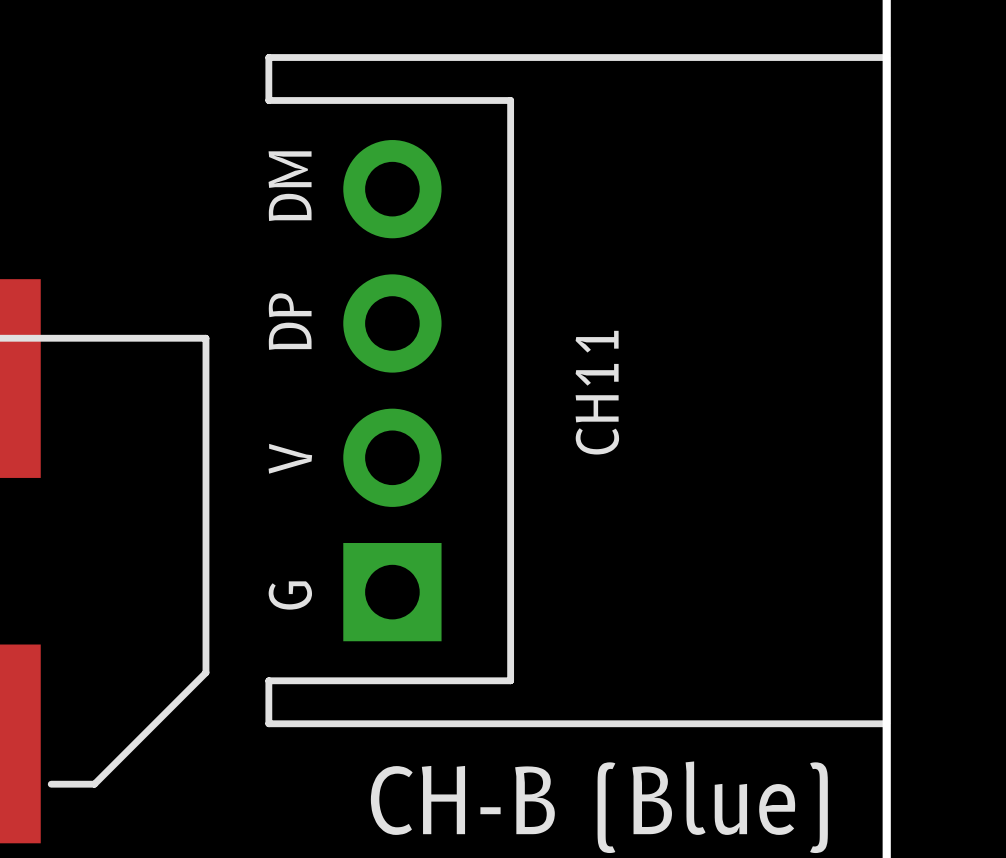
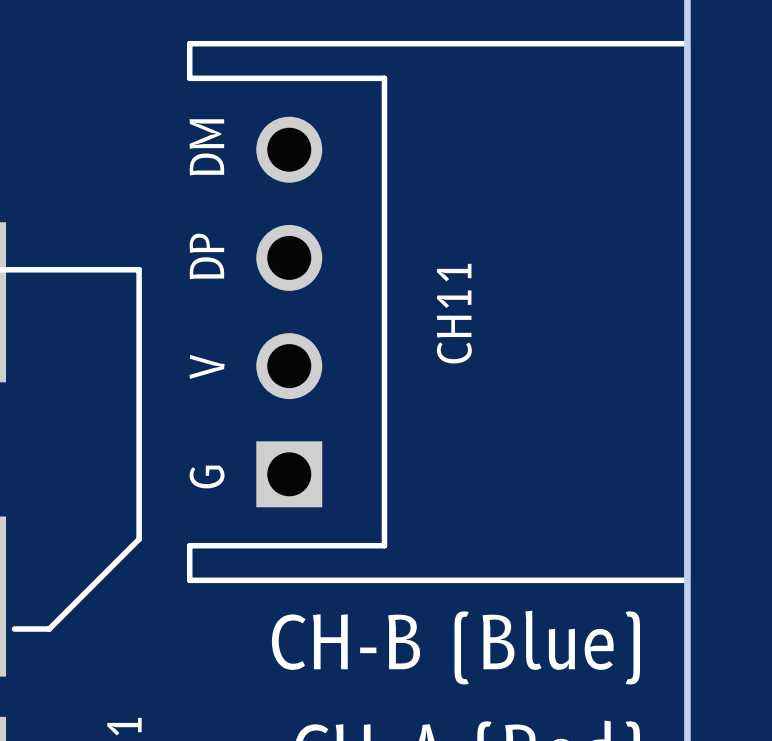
CH11 footprint: [265, 54, 891, 728] -> [186, 40, 691, 584]

